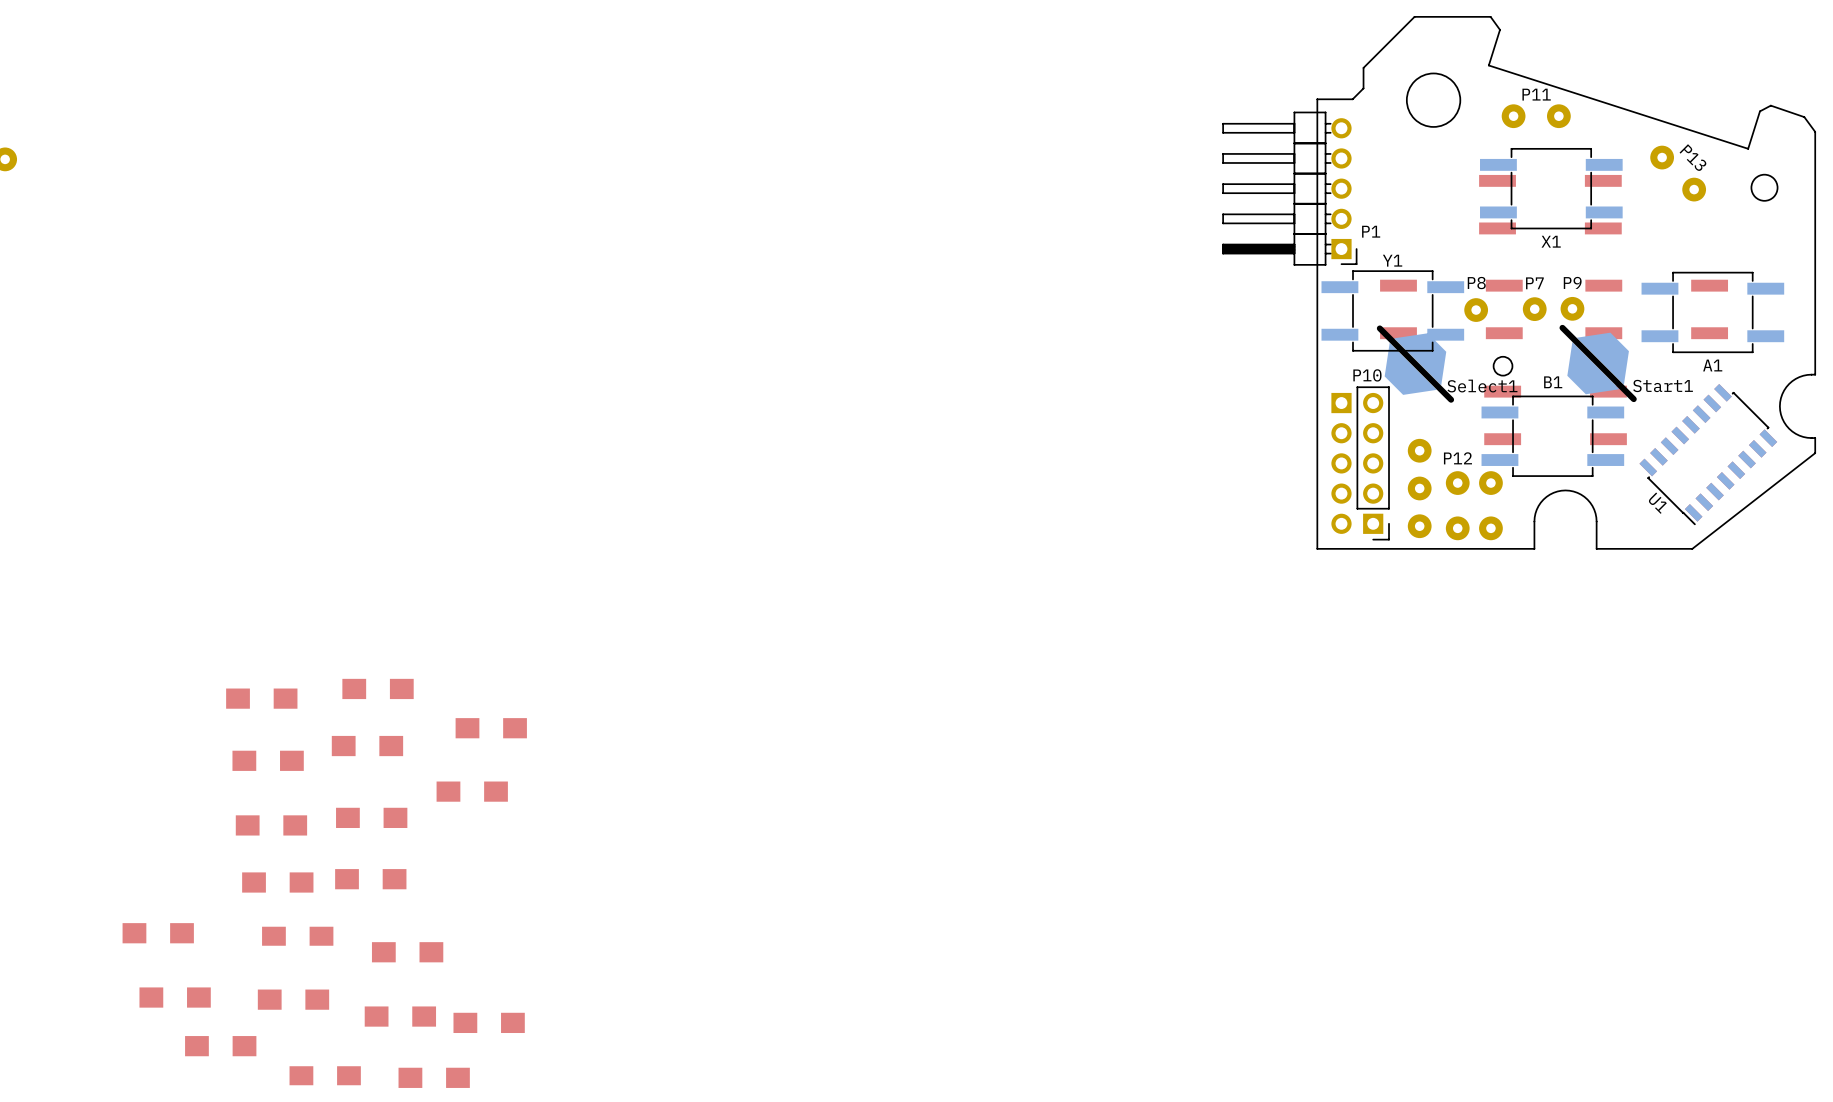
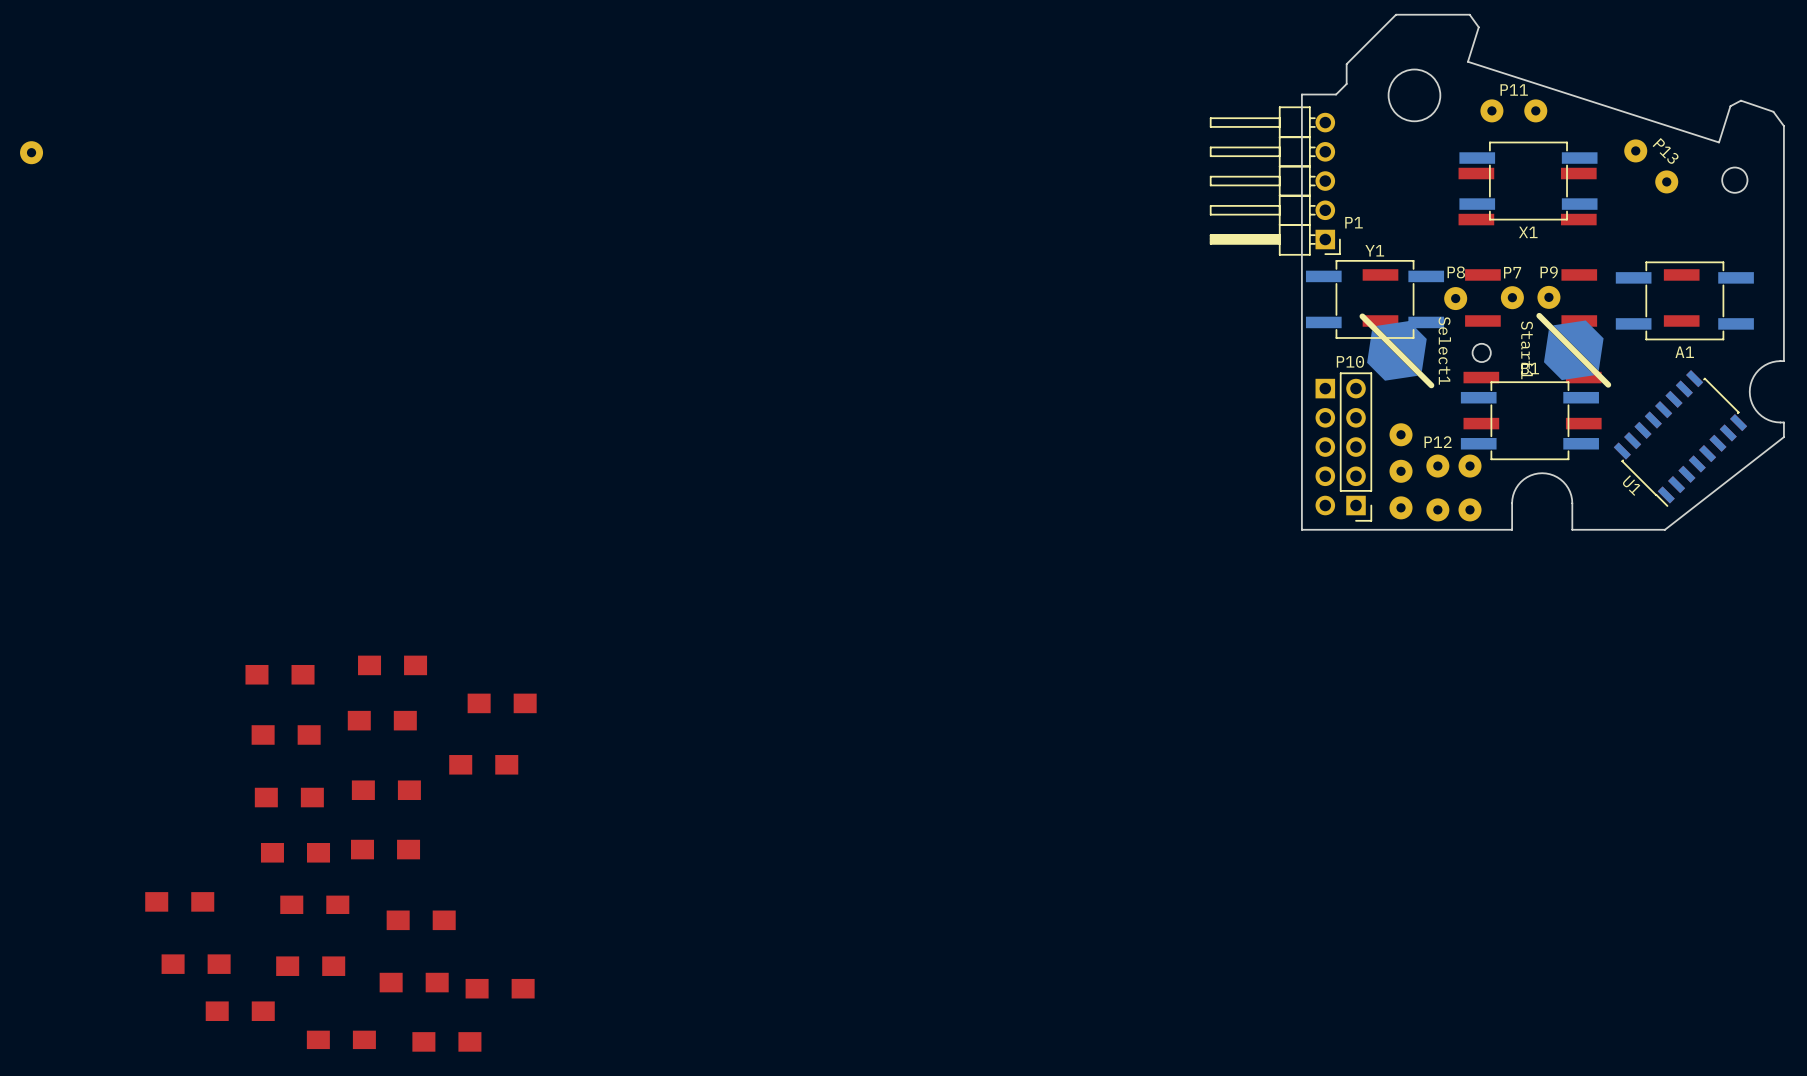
Start1 name rotation: 0° (1663, 385) -> 90° clockwise (1527, 350)
Start1 name position: Start1 (1663, 385) -> Start1 (1527, 350)
Select1 name rotation: 0° (1482, 386) -> 90° clockwise (1444, 350)

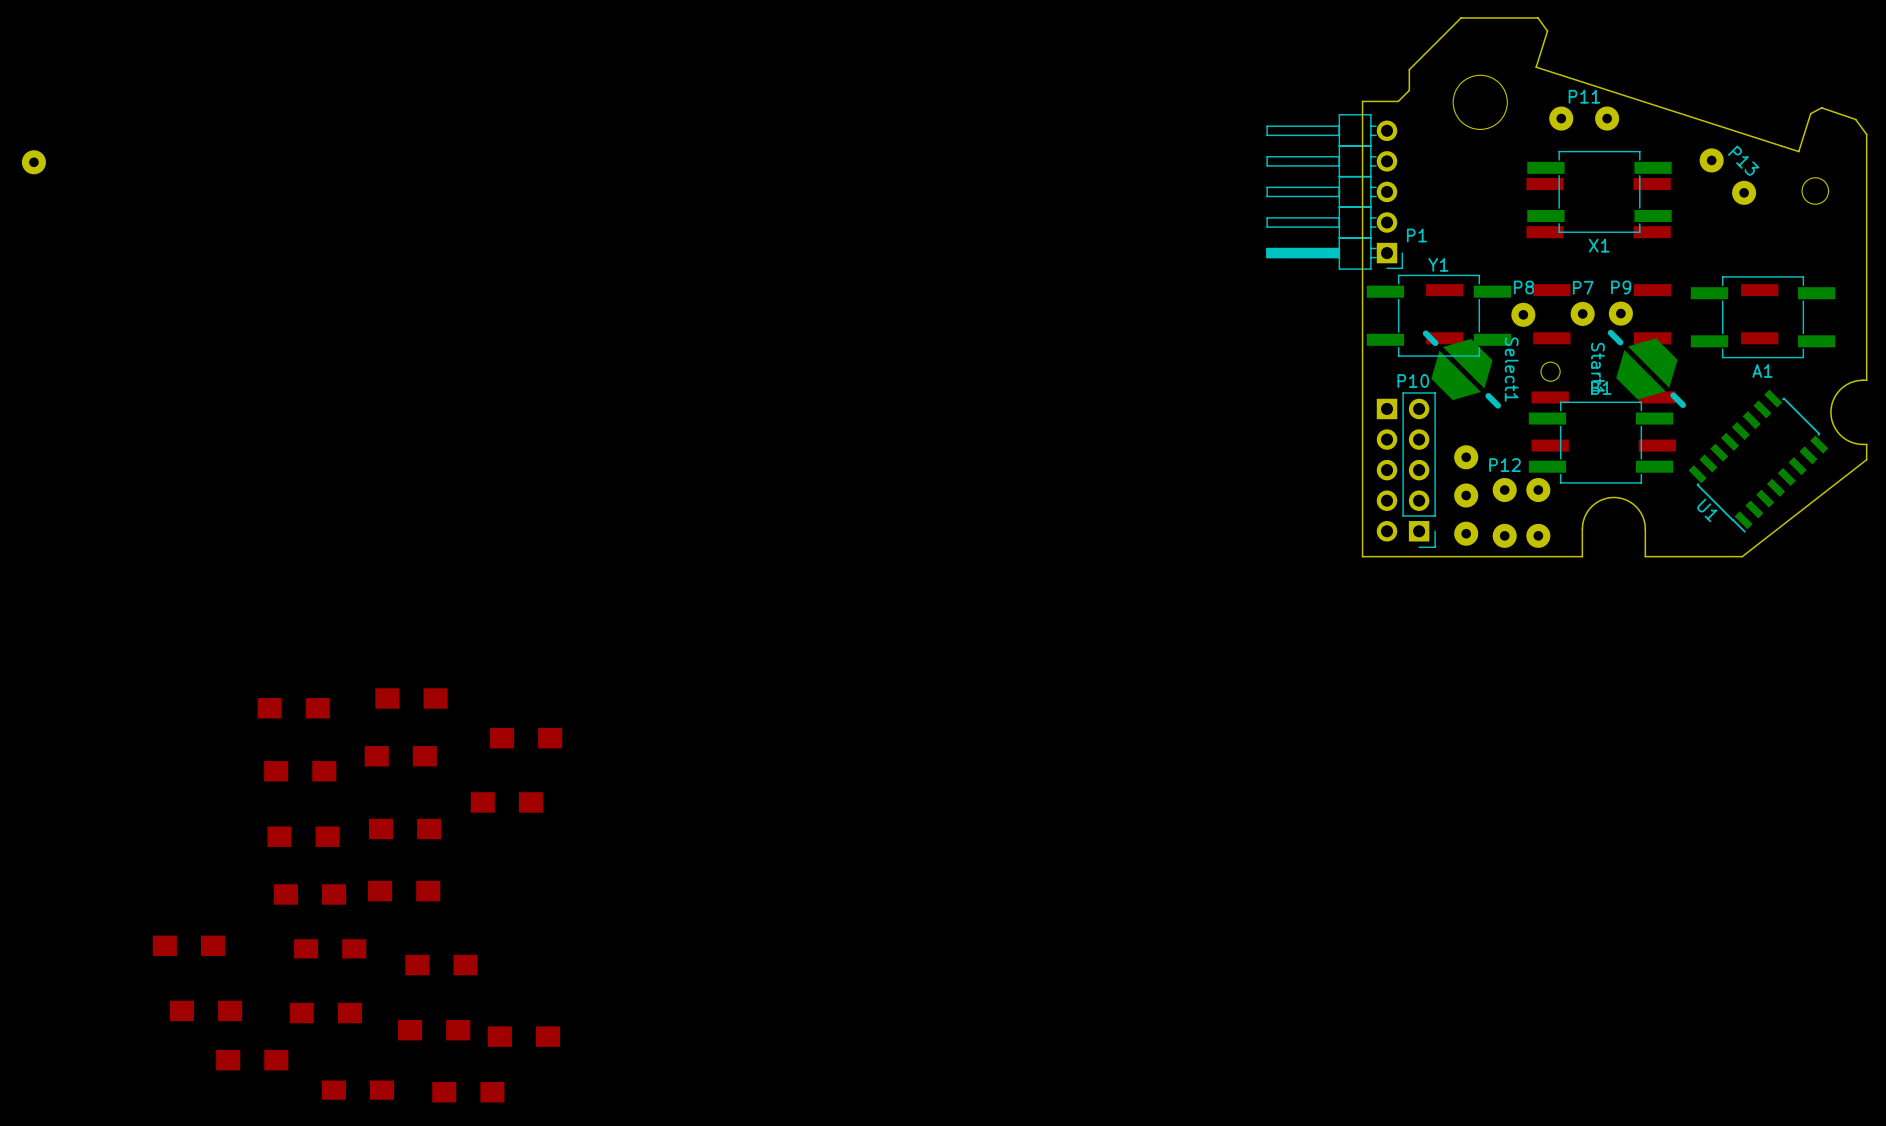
Start1 footprint: [1536, 312, 1612, 388] -> [1607, 329, 1686, 409]
Select1 footprint: [1359, 313, 1435, 389] -> [1422, 330, 1502, 409]

